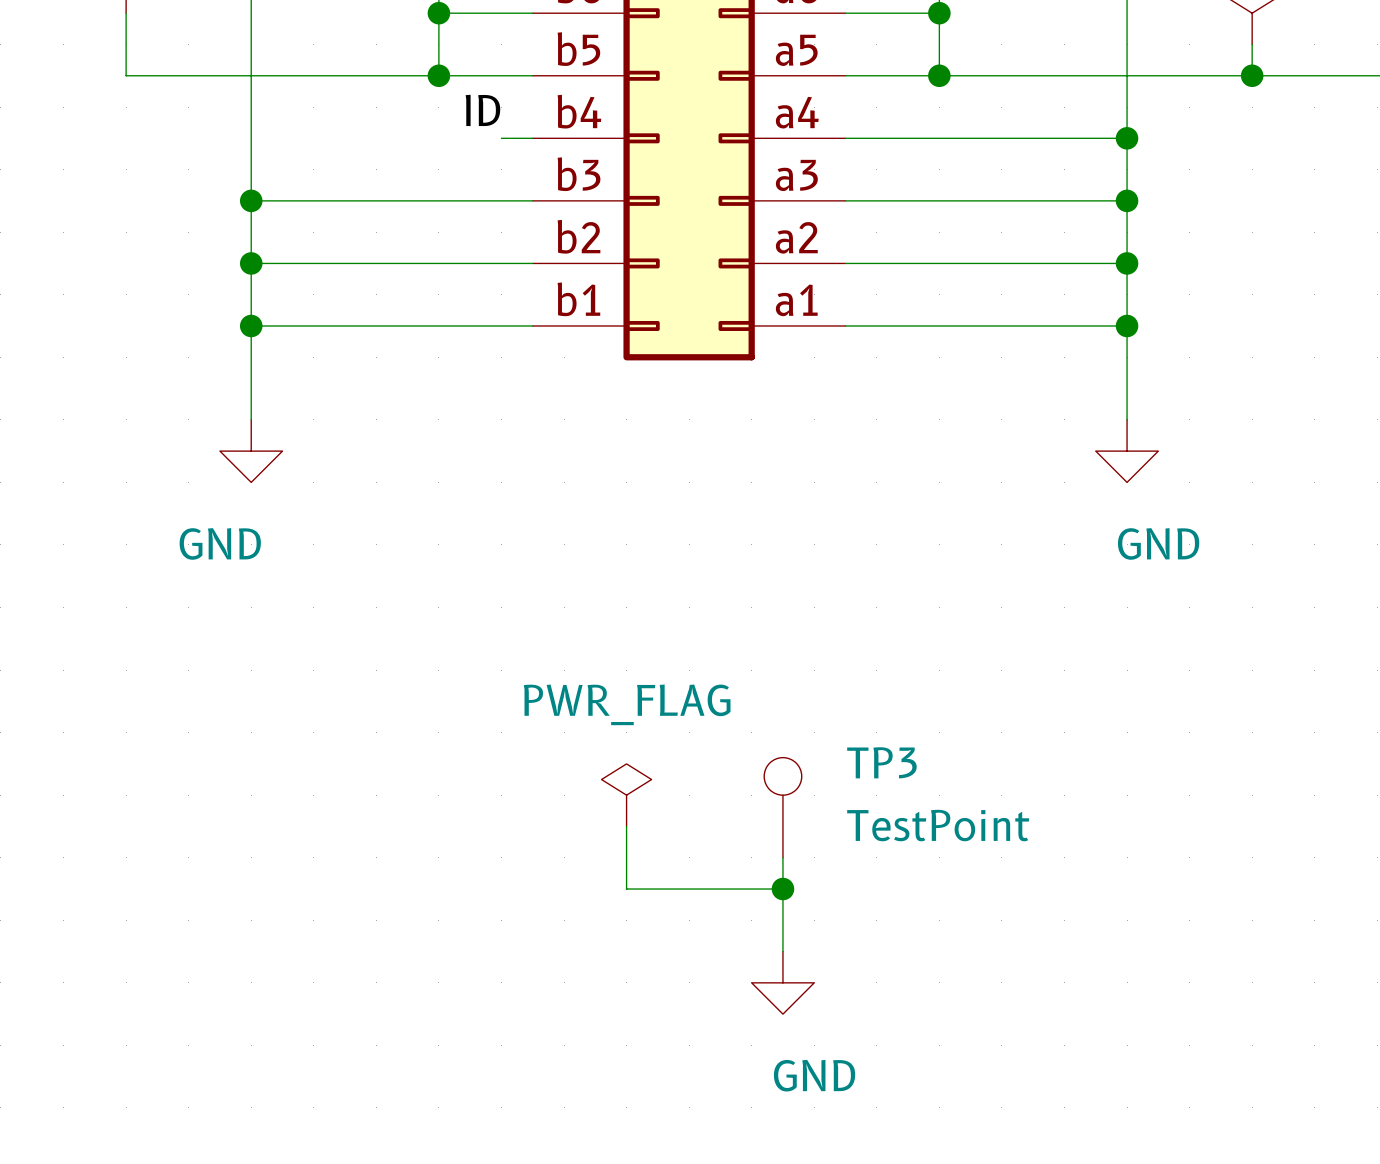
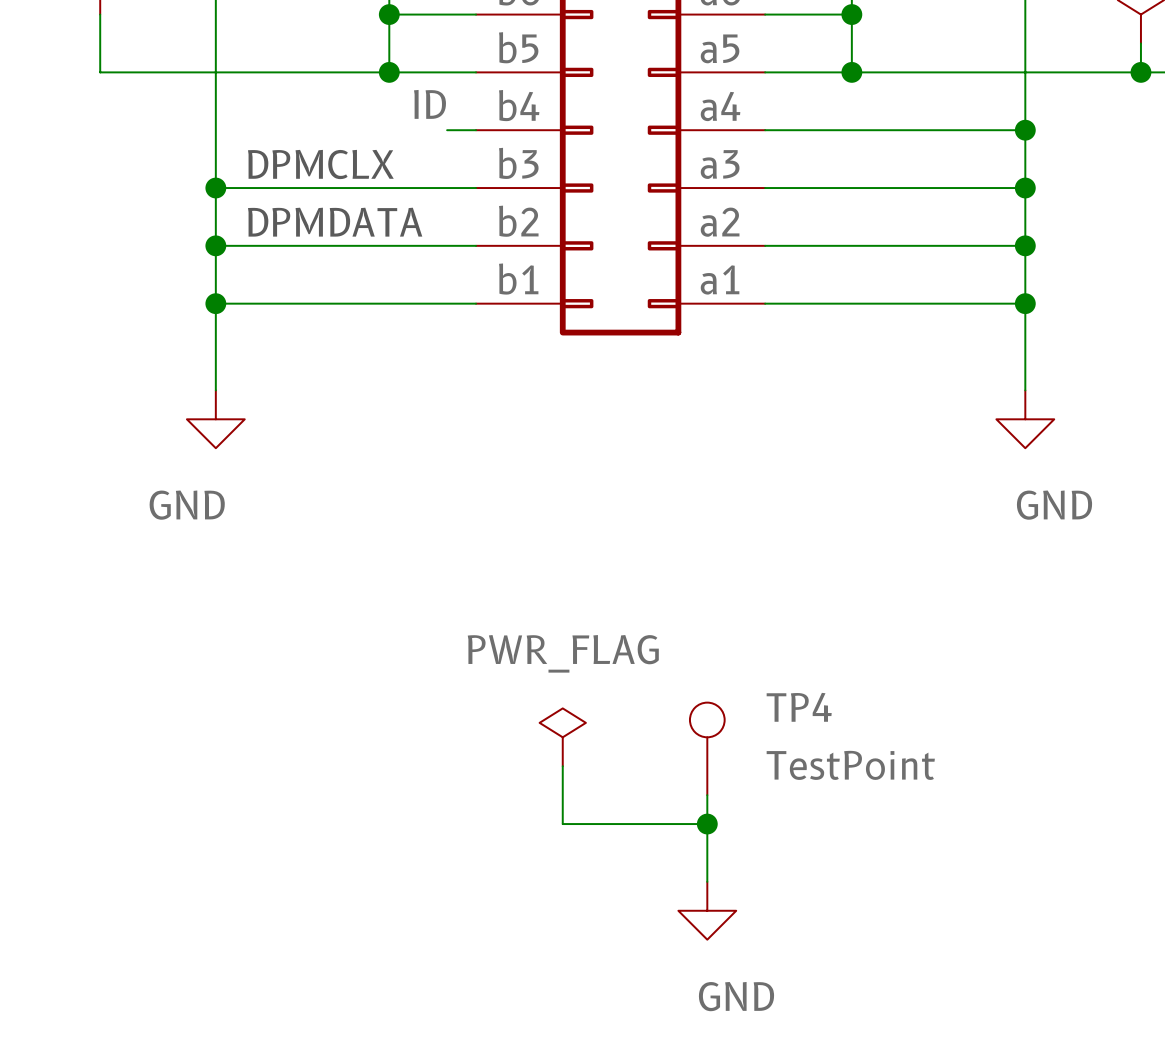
text: none -> DPMCLX (320, 164)
text: none -> DPMDATA (335, 222)
TP3 name: TP3 (881, 762) -> TP4 (799, 707)

